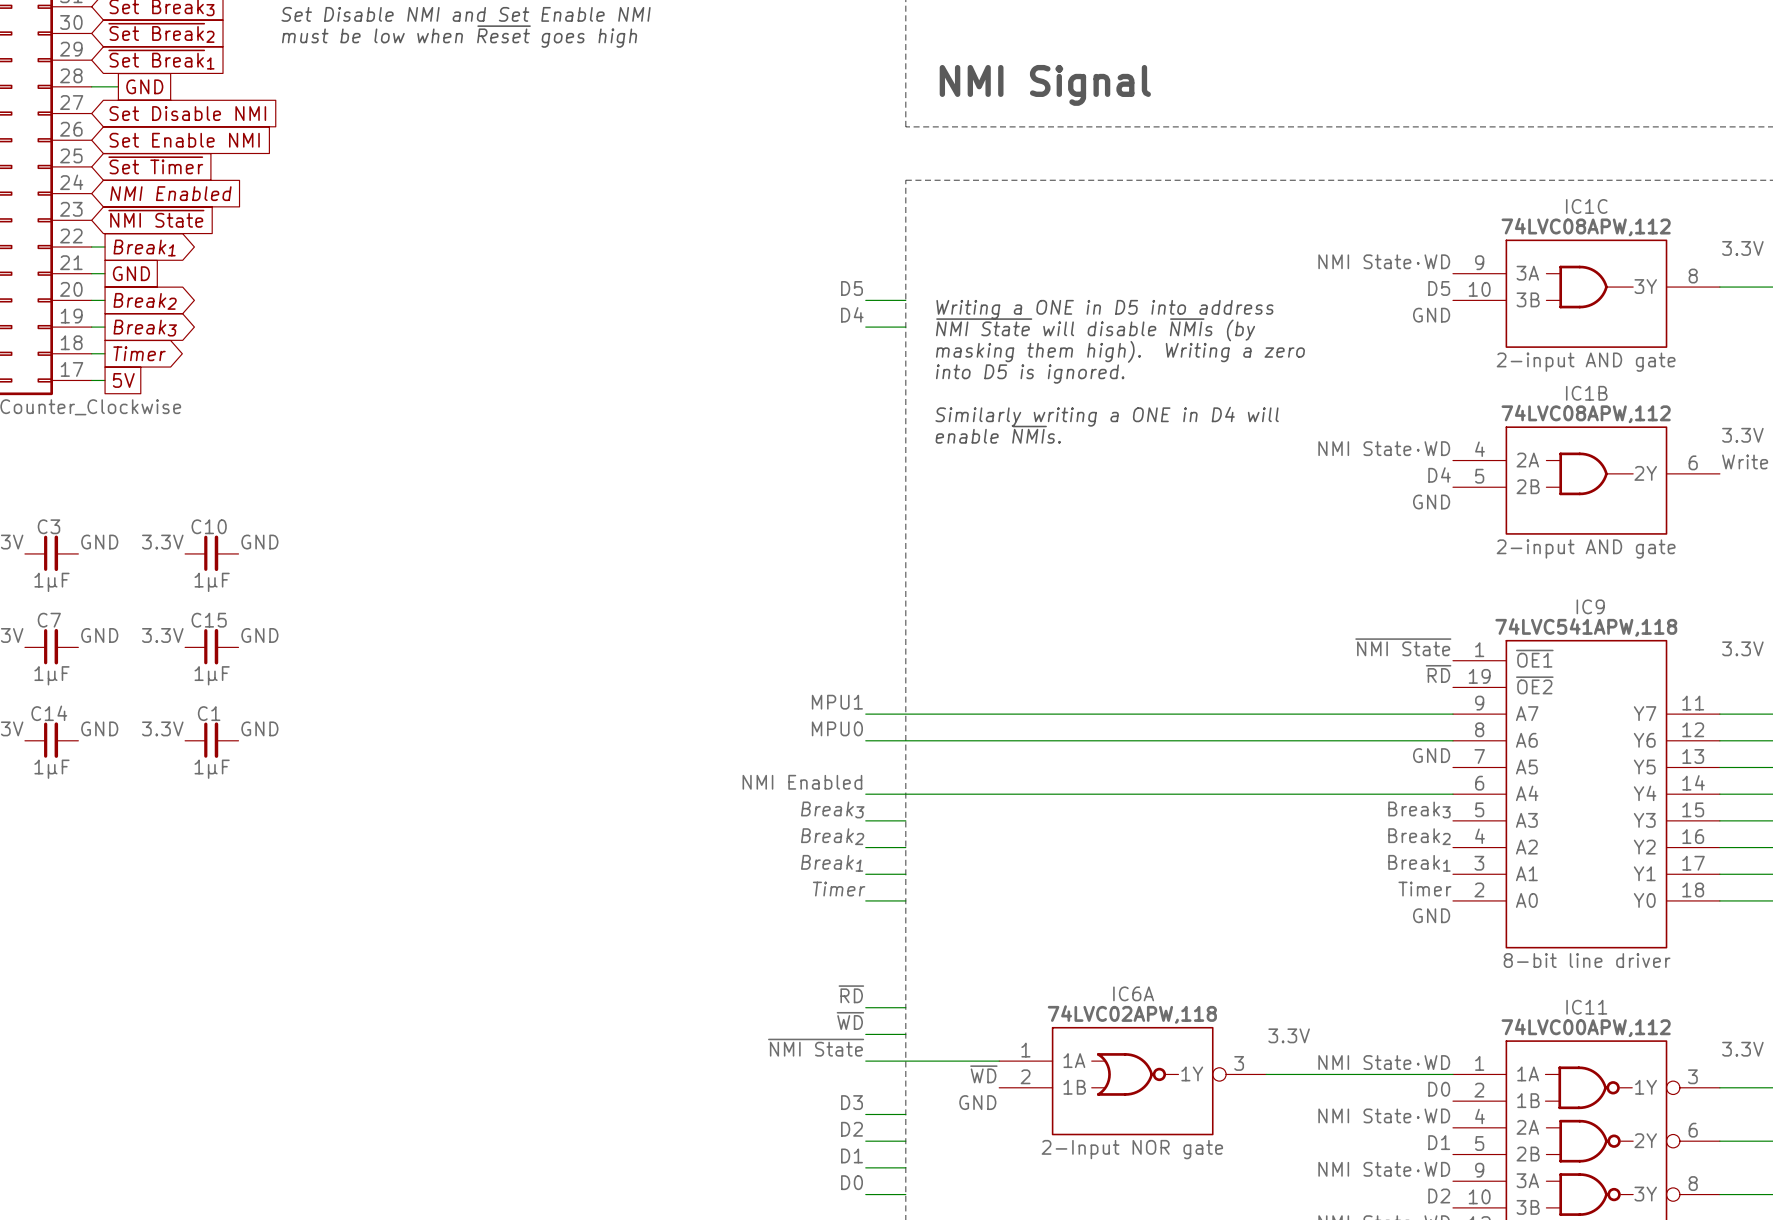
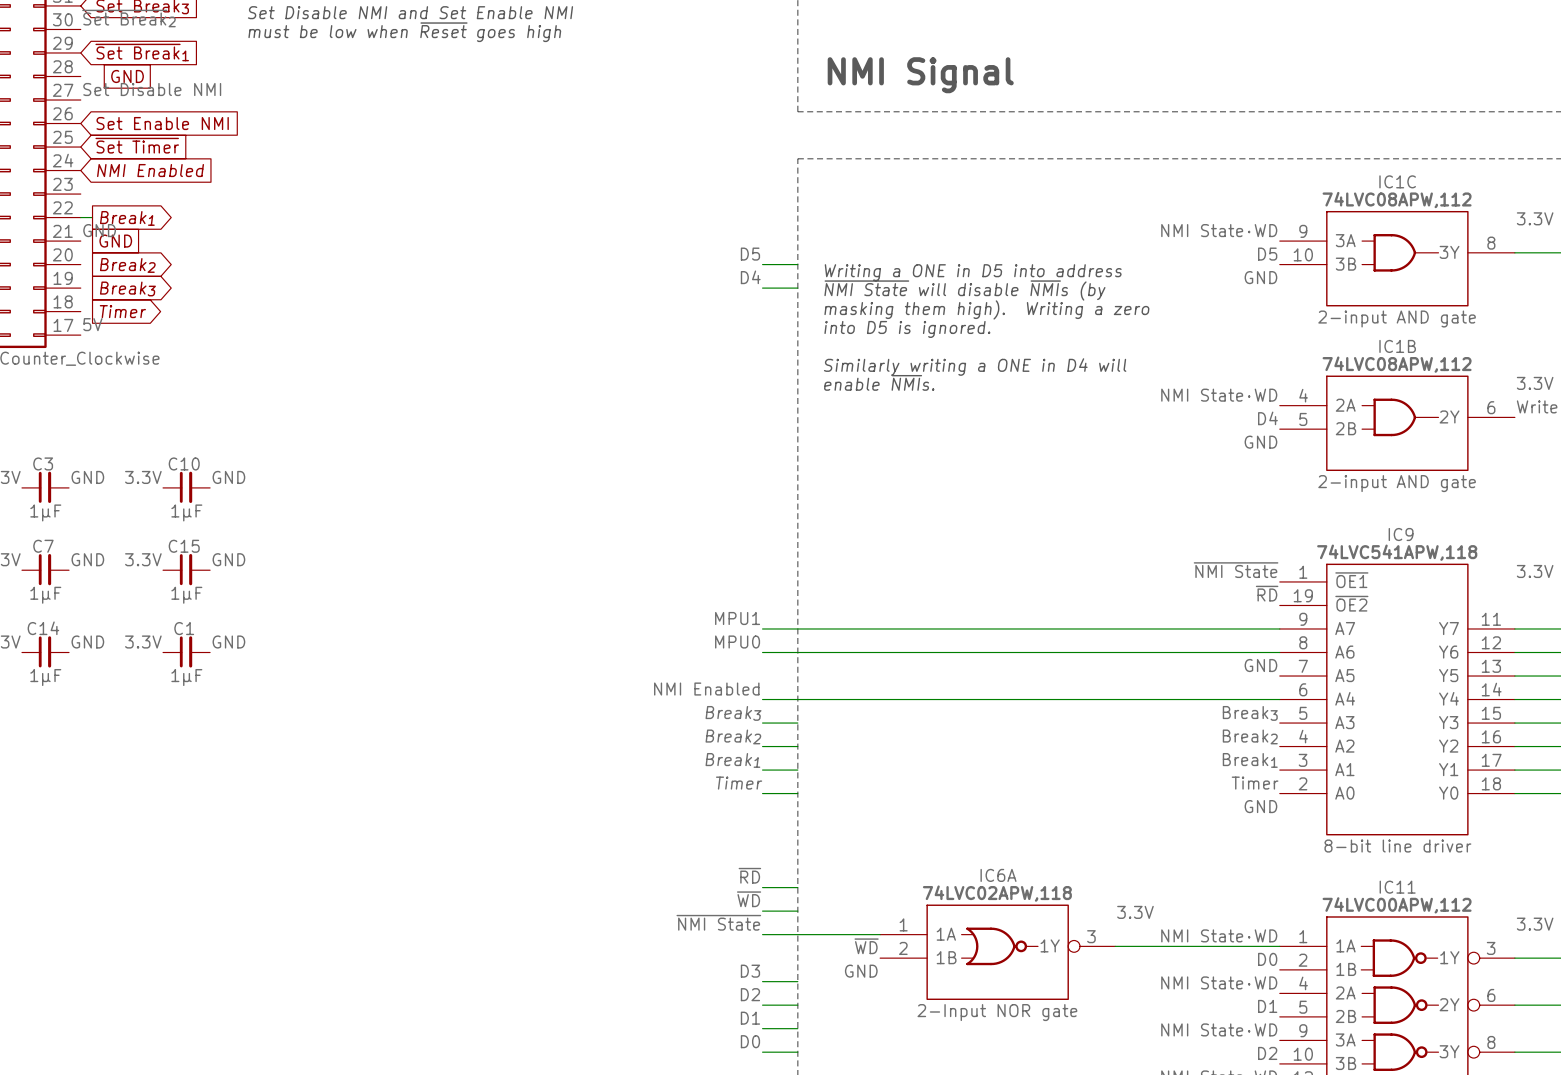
label: none -> ~{Set Break}2 (128, 18)
global label: ~{Set Break}2 (161, 32) -> none
wire: (91, 86) (118, 86) -> none
label: none -> Set Disable NMI (152, 89)
global label: Set Disable NMI (187, 113) -> none
global label: ~{NMI State} (156, 218) -> none
label: none -> GND (99, 230)
wire: (91, 273) (105, 273) -> none
wire: (91, 300) (105, 300) -> none
wire: (91, 327) (105, 327) -> none
wire: (91, 353) (105, 353) -> none
label: none -> 5V (92, 324)
wire: (91, 380) (105, 380) -> none
global label: 5V (123, 380) -> none

